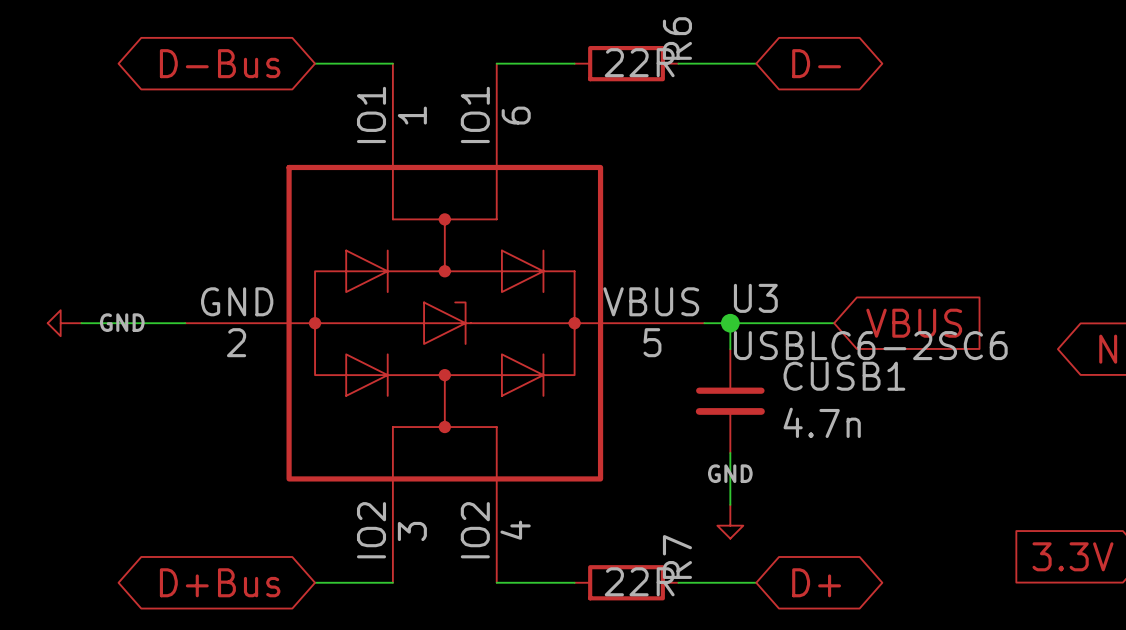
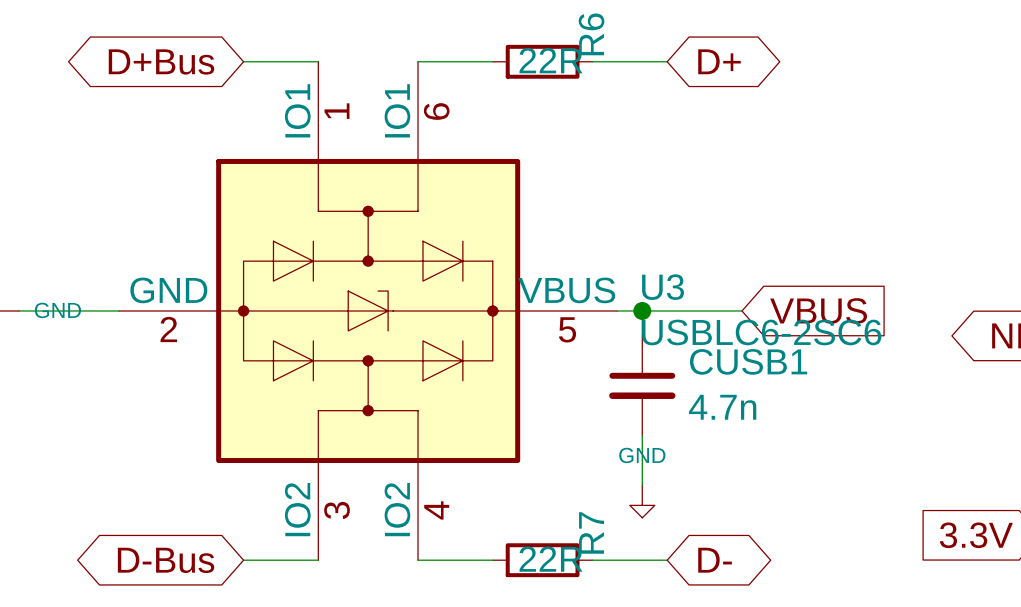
global label: D-Bus (220, 63) -> D+Bus (161, 61)
global label: D- (816, 63) -> D+ (719, 61)
global label: D+Bus (220, 582) -> D-Bus (166, 560)
global label: D+ (816, 582) -> D- (715, 560)

